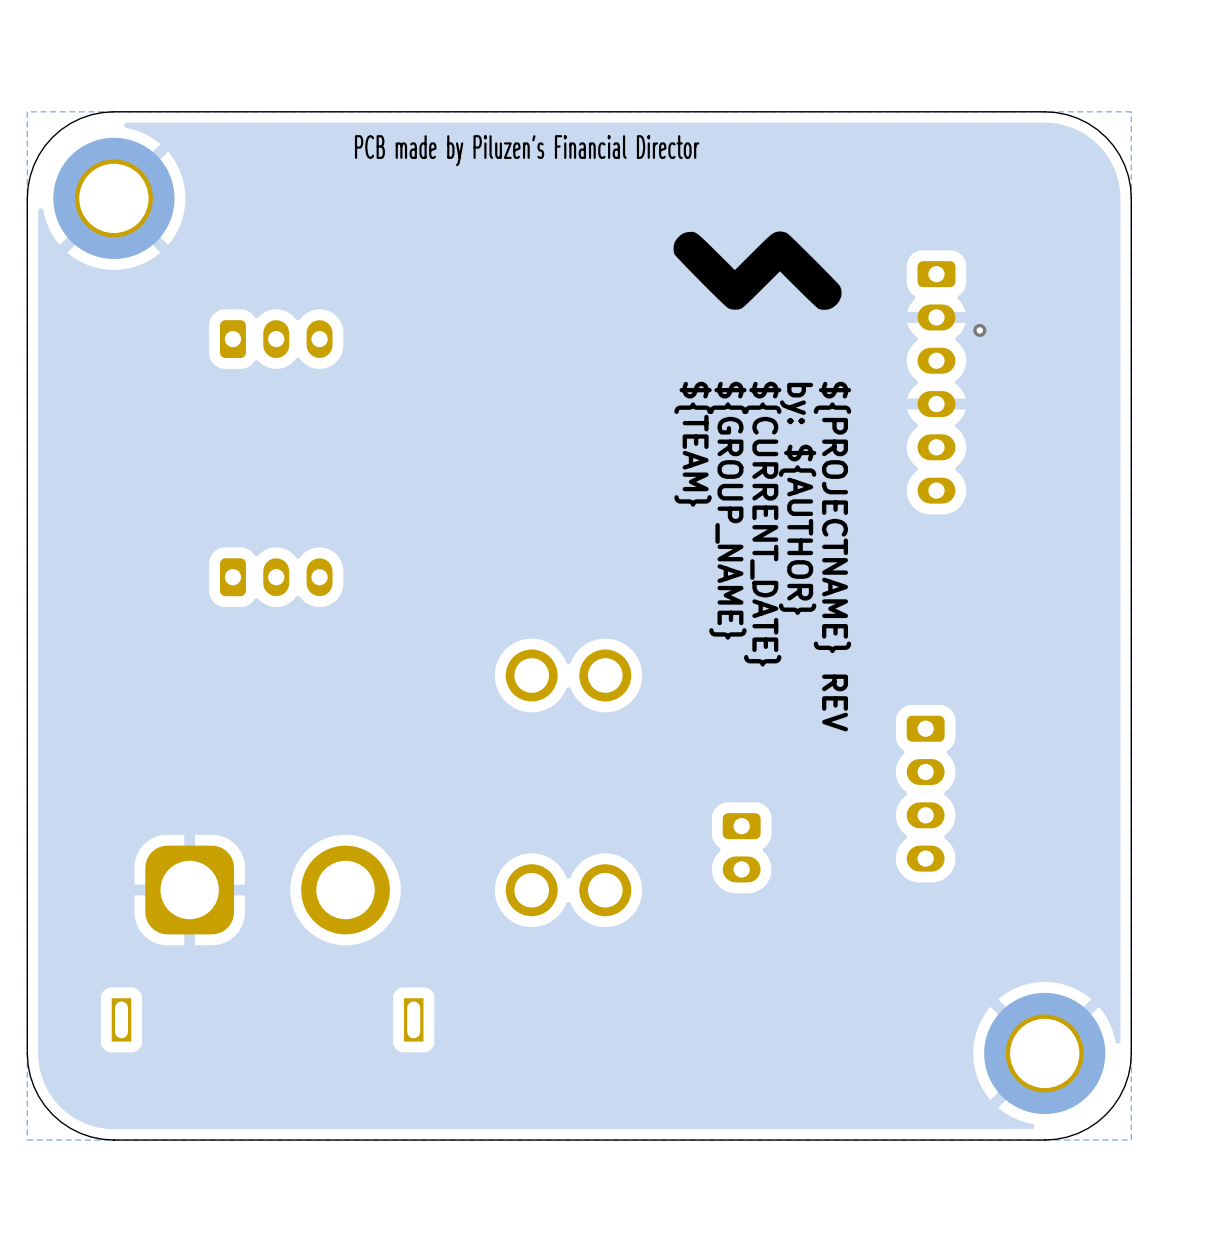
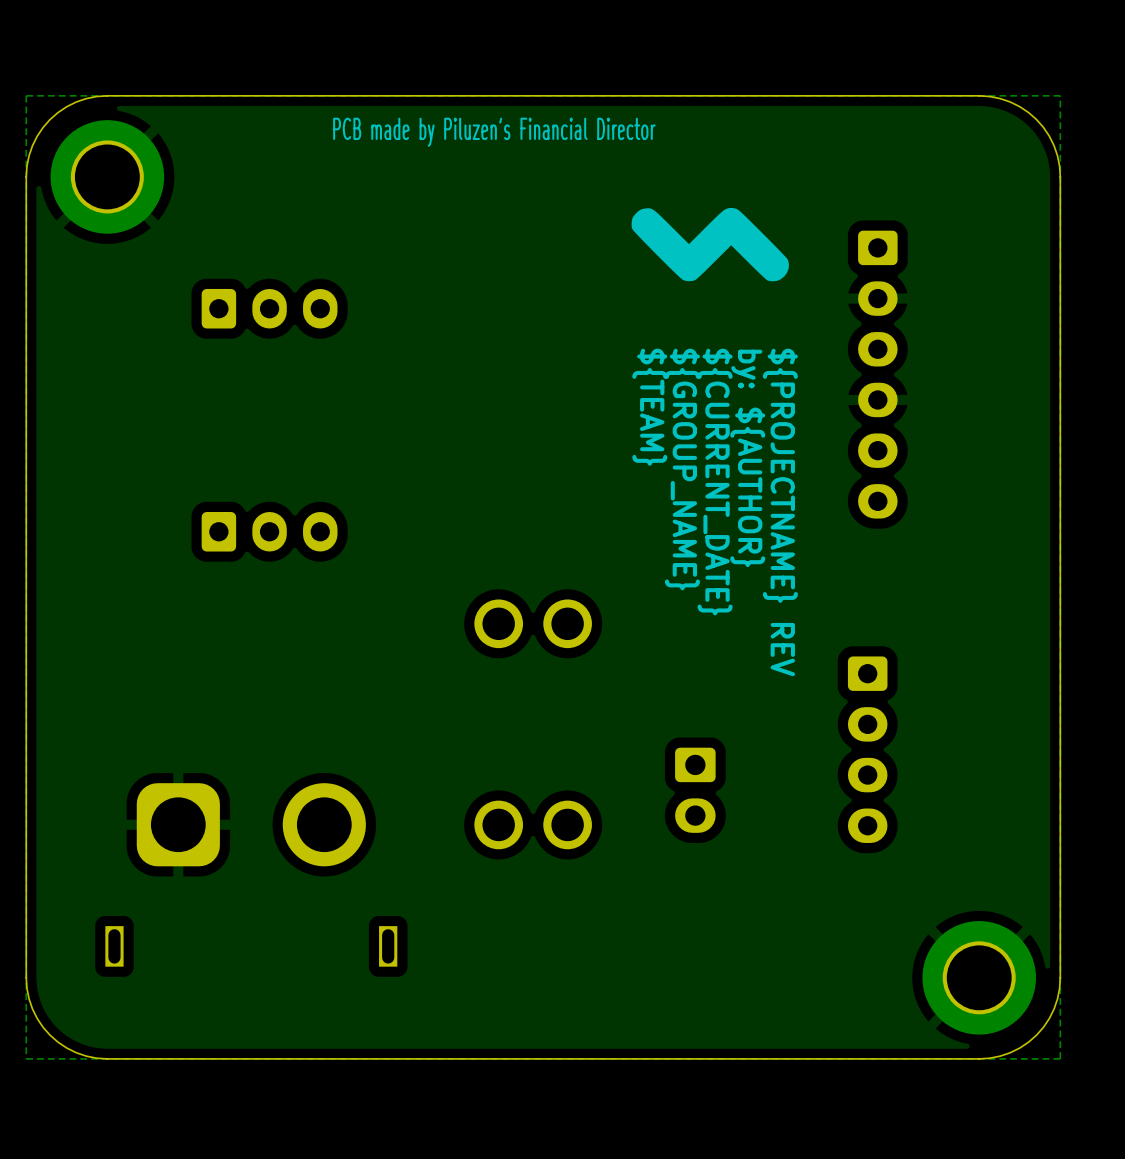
part footprint: [219, 320, 333, 359] -> [201, 288, 338, 329]
via: (979, 330) -> none
part: (936, 382) -> none
part: none -> (877, 374)
part footprint: [219, 558, 333, 597] -> [201, 511, 338, 552]
part footprint: [906, 715, 945, 872] -> [847, 656, 888, 843]
part footprint: [722, 813, 761, 883] -> [675, 747, 716, 833]

